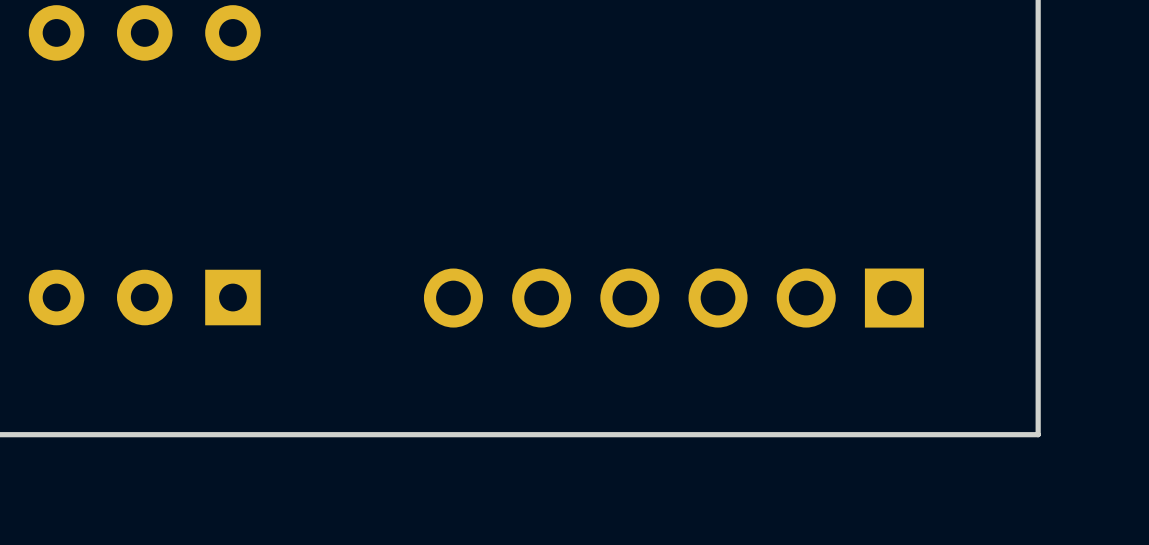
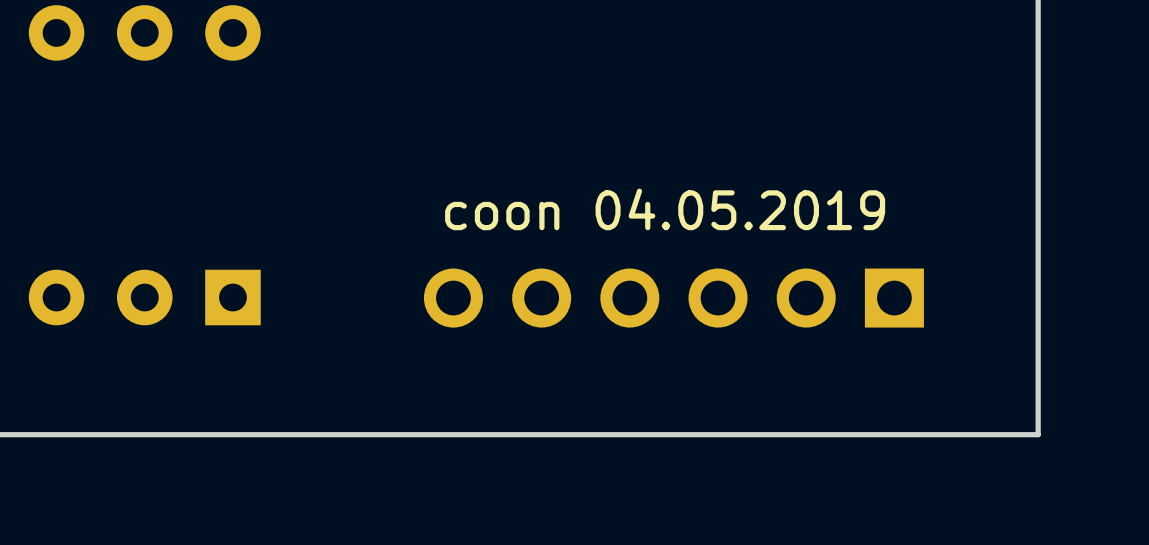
text: none -> coon 04.05.2019 (665, 209)

